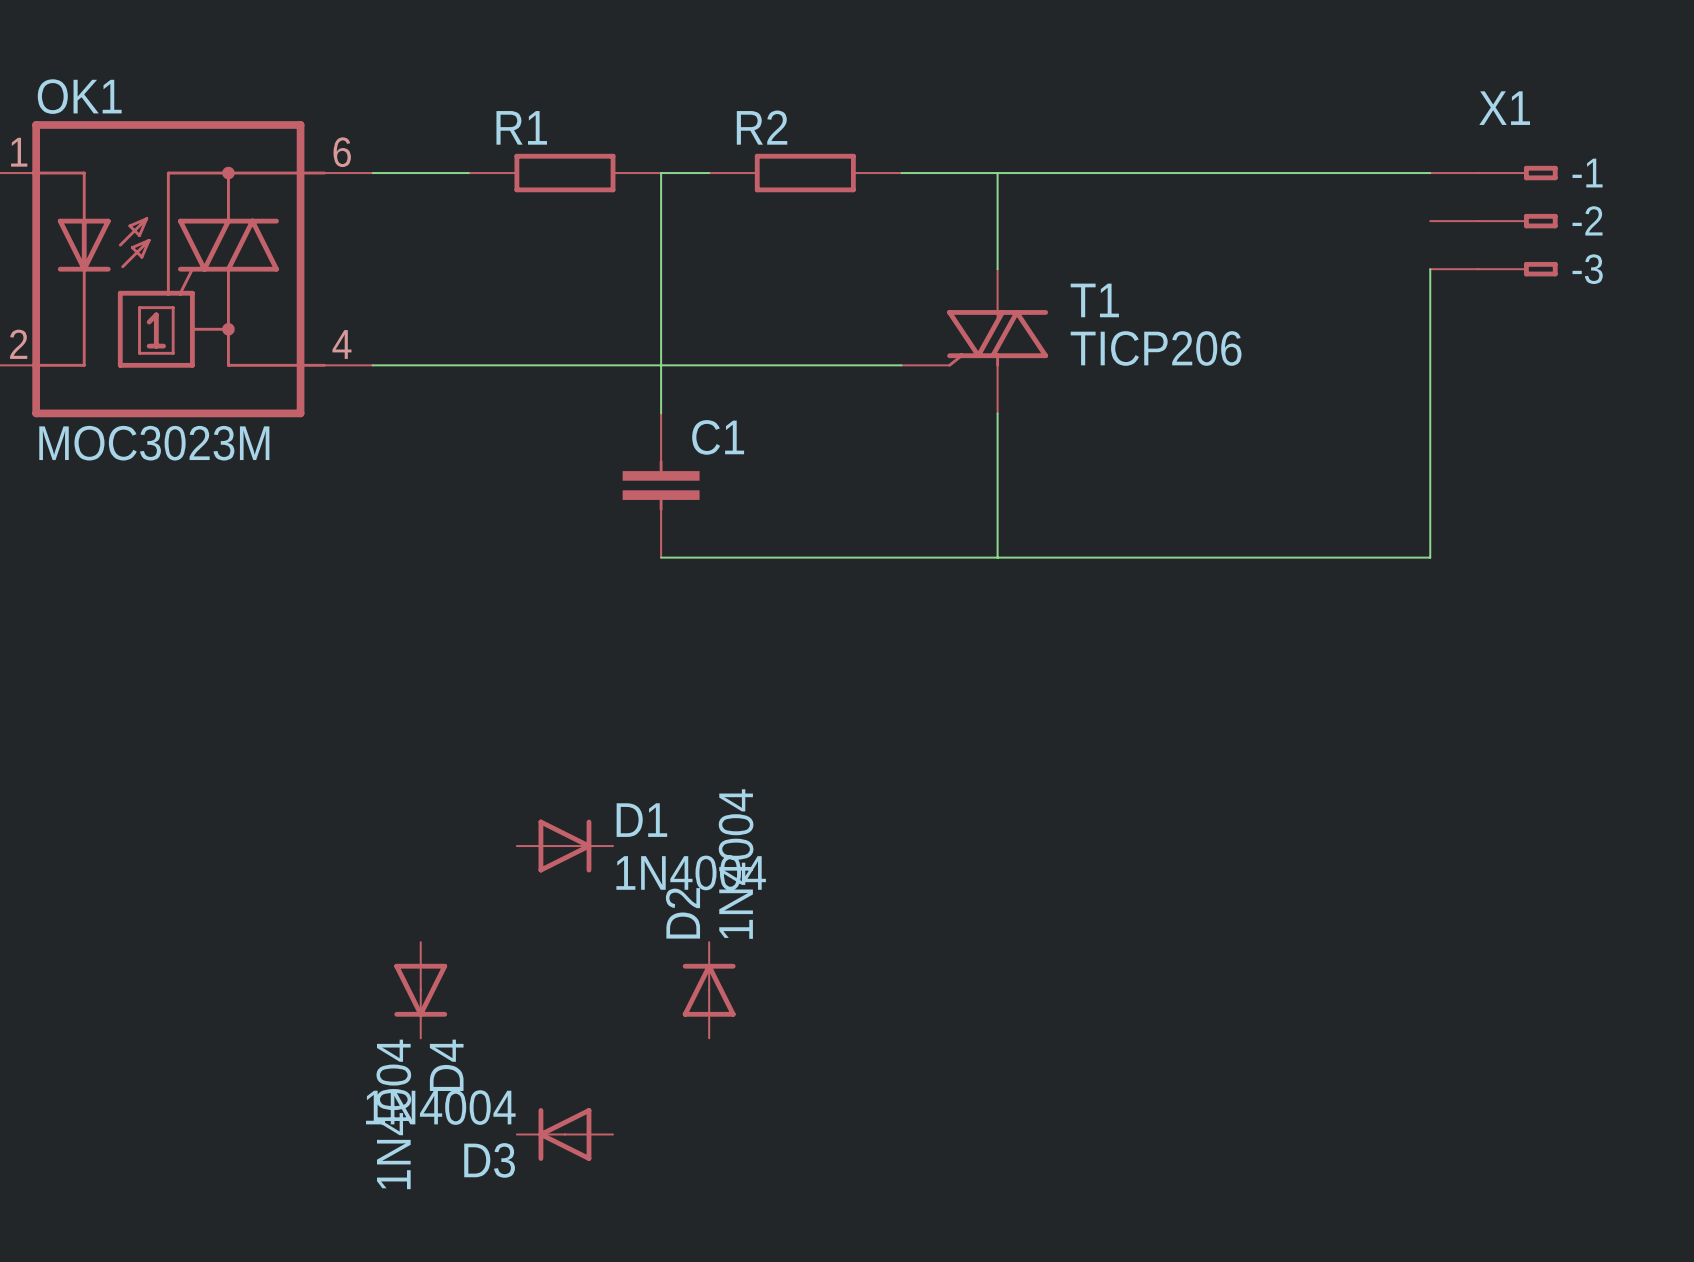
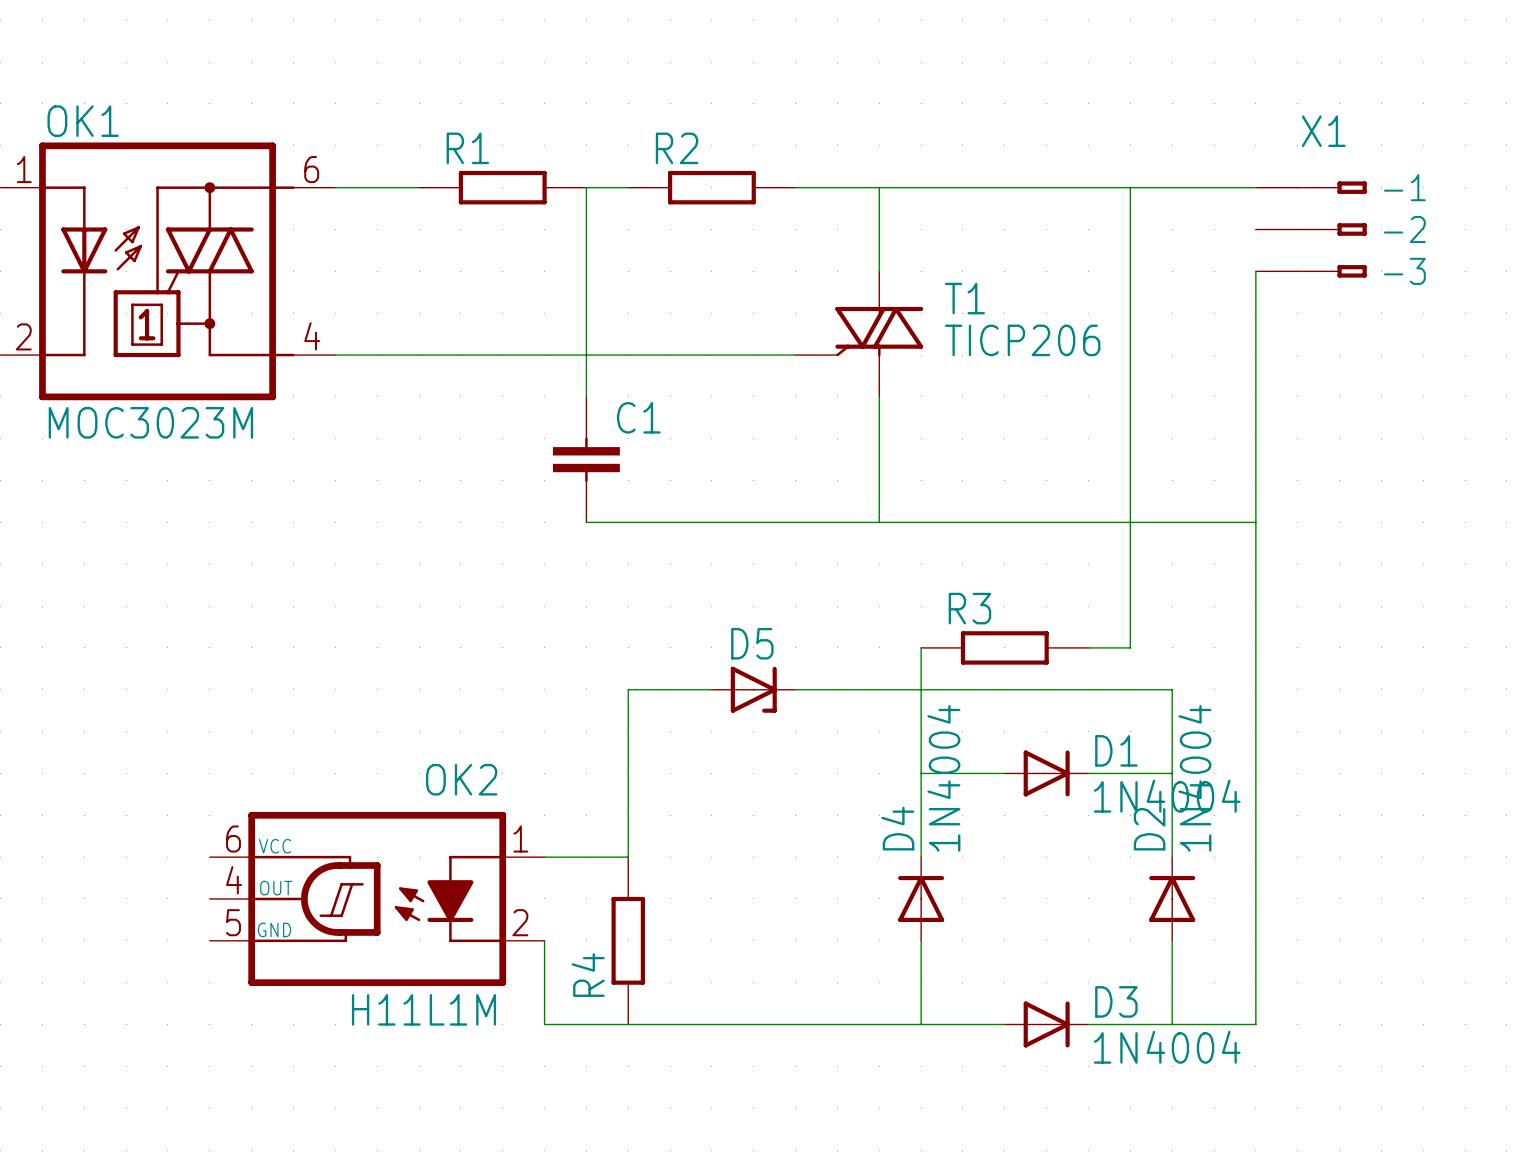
wire: none -> (1130, 187) (1130, 647) (1088, 647)
wire: none -> (1255, 522) (1255, 1024) (1088, 1024)
wire: none -> (921, 647) (921, 857)
R3: none -> (1004, 647)
wire: none -> (711, 689) (628, 689) (628, 857) (544, 857)
D5: none -> (753, 689)
wire: none -> (795, 689) (1172, 689) (1172, 857)
D1 position: (564, 846) -> (1046, 773)
wire: none -> (921, 773) (1004, 773)
wire: none -> (1088, 773) (1172, 773)
D4 rotation: 0° (420, 990) -> 180° (921, 898)
D4 position: (420, 990) -> (921, 898)
OK2: none -> H11L1M (377, 898)
D2 position: (709, 990) -> (1172, 898)
wire: none -> (544, 940) (544, 1024) (1004, 1024)
R4: none -> (628, 940)
wire: none -> (921, 940) (921, 1024)
wire: none -> (1172, 940) (1172, 1024)
D3 rotation: 0° (564, 1134) -> 180° (1046, 1024)
D3 position: (564, 1134) -> (1046, 1024)

